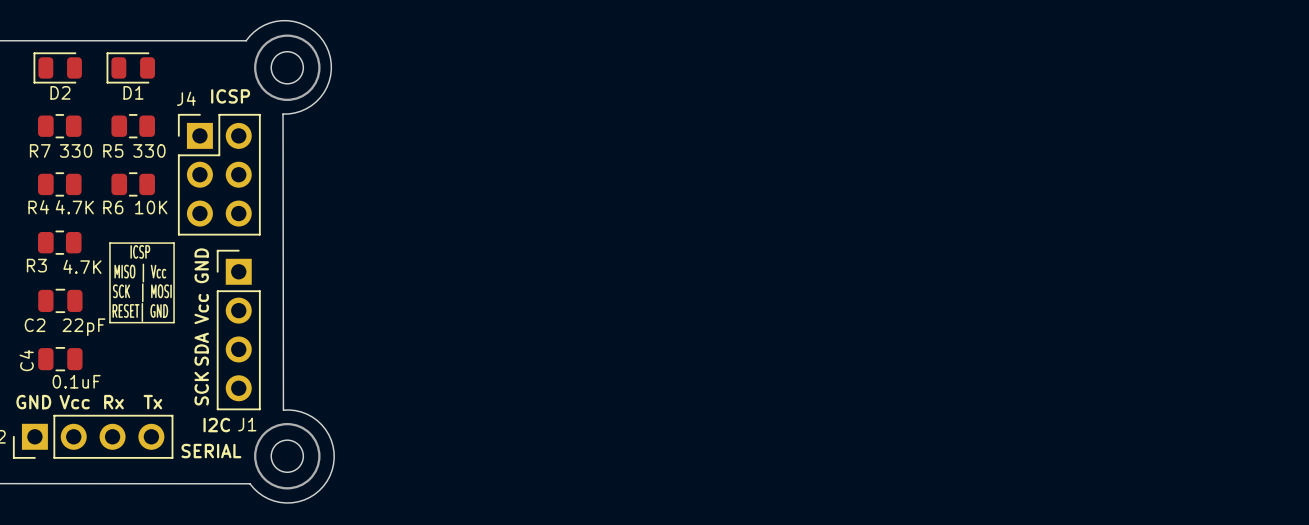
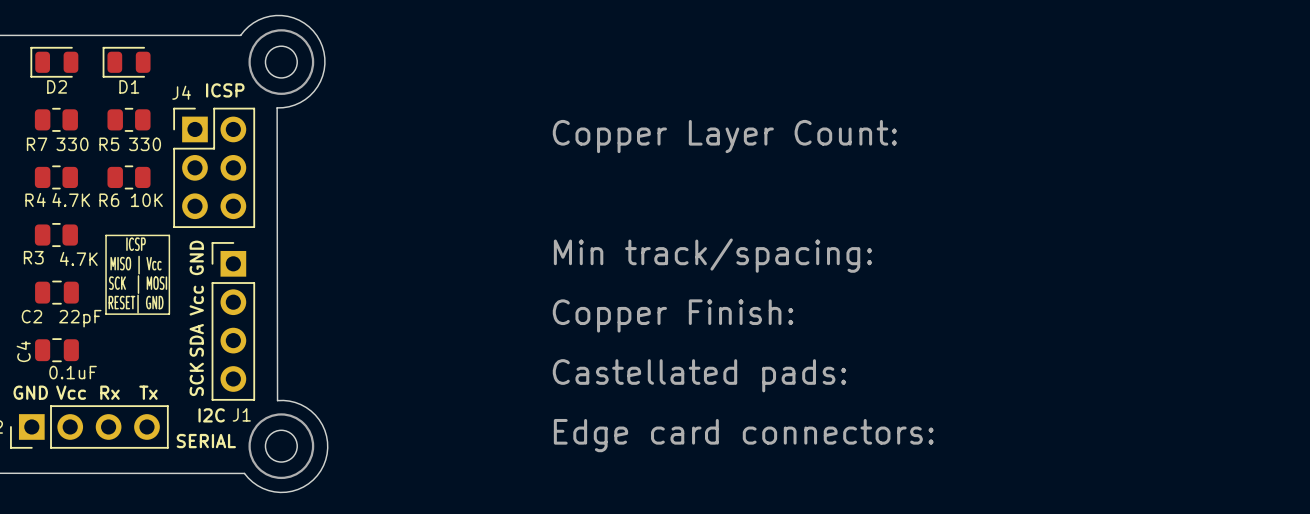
text: none -> Copper Layer Count: (724, 136)
text: none -> Min track/spacing: (712, 255)
text: none -> Copper Finish: (673, 315)
text: none -> Castellated pads: (699, 375)
text: none -> Edge card connectors: (743, 435)

